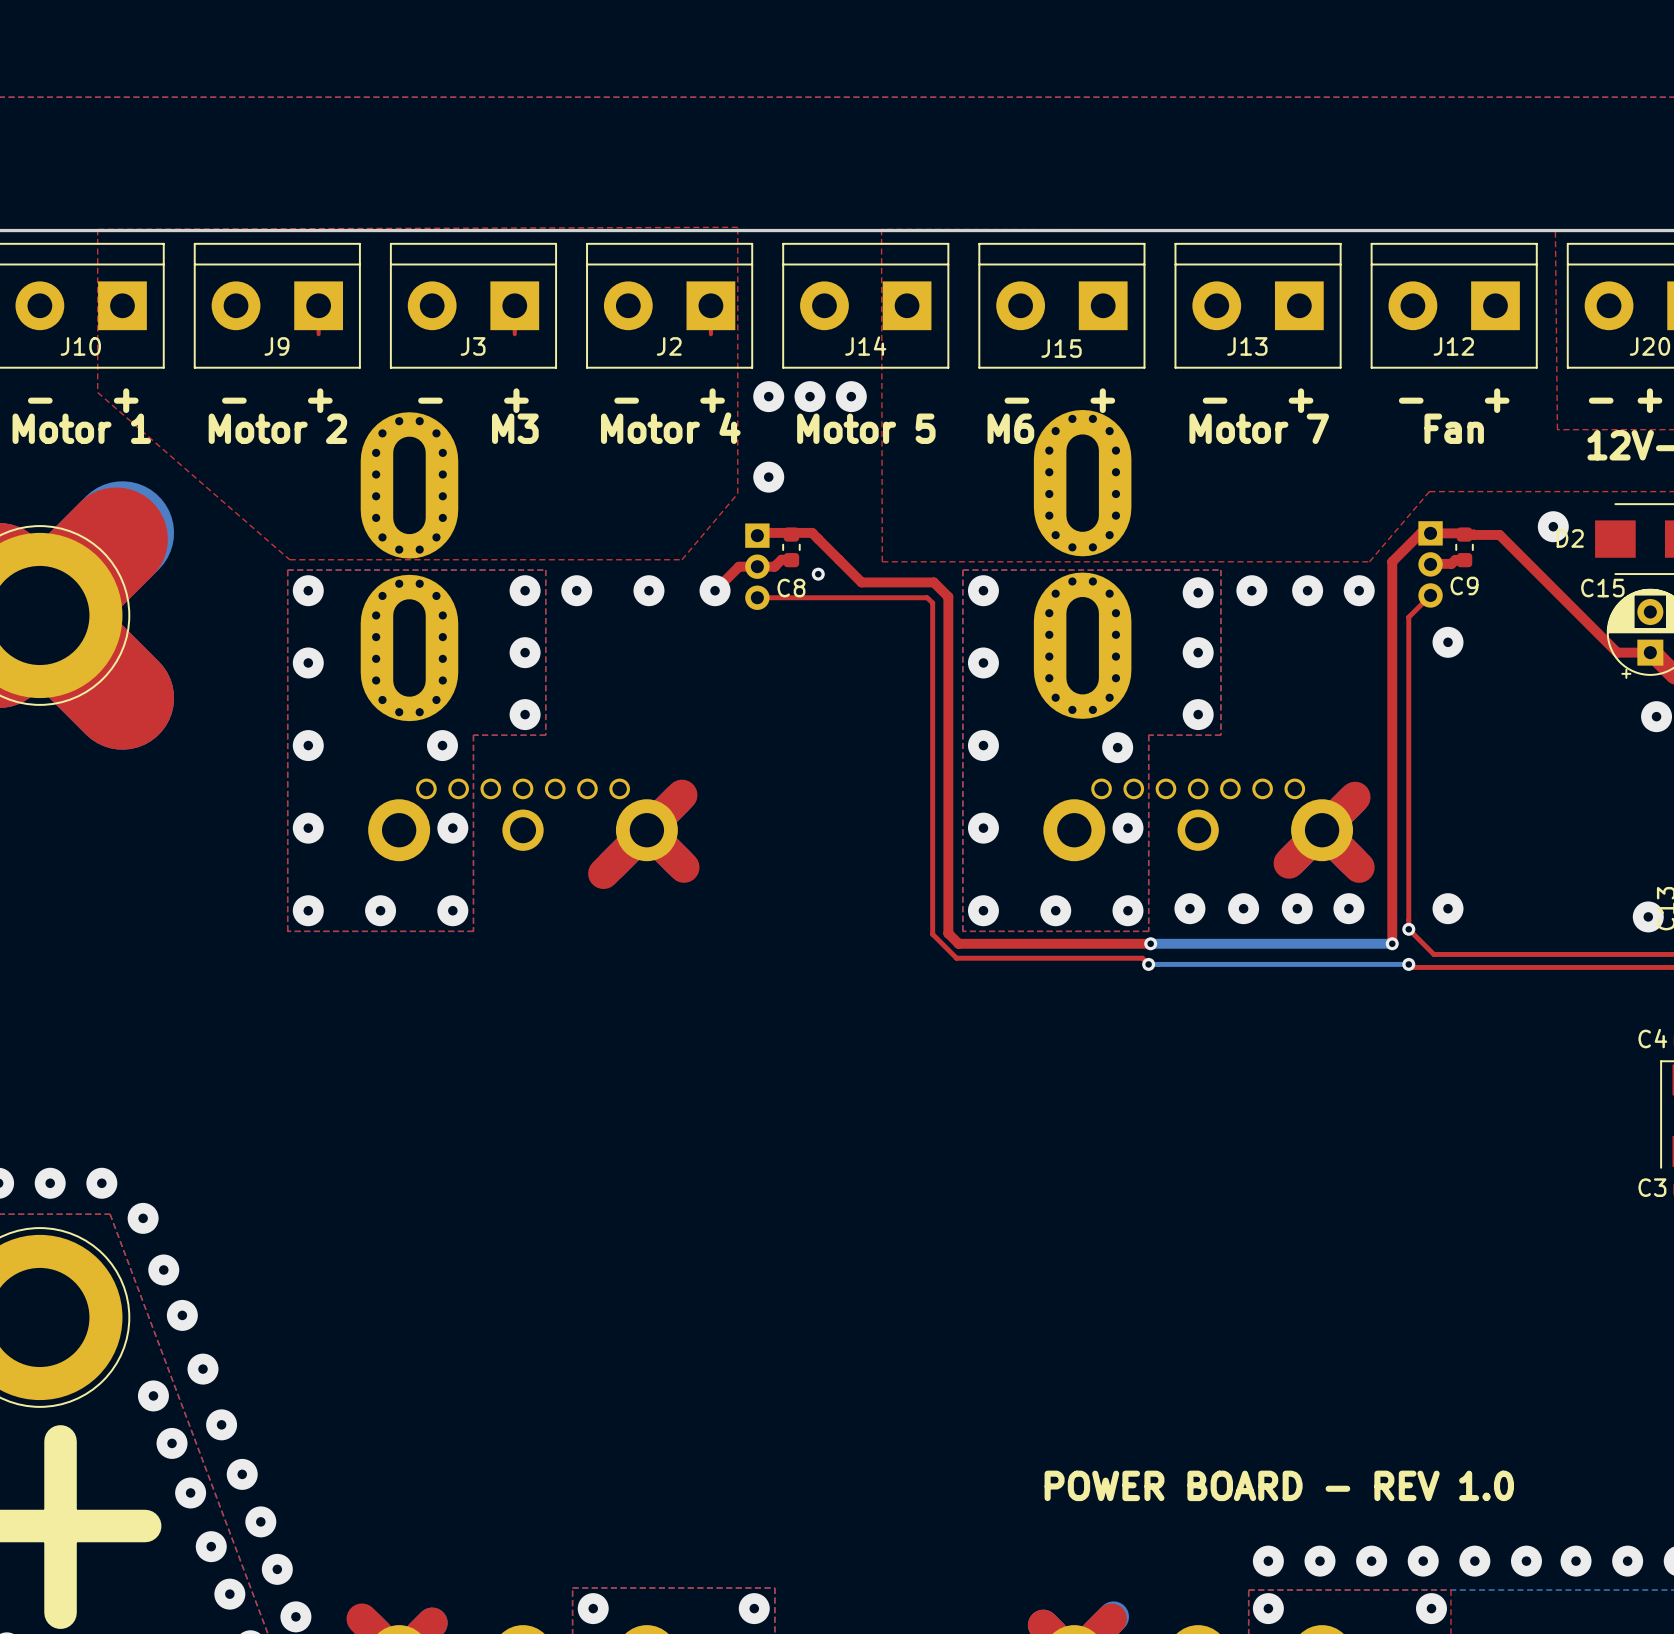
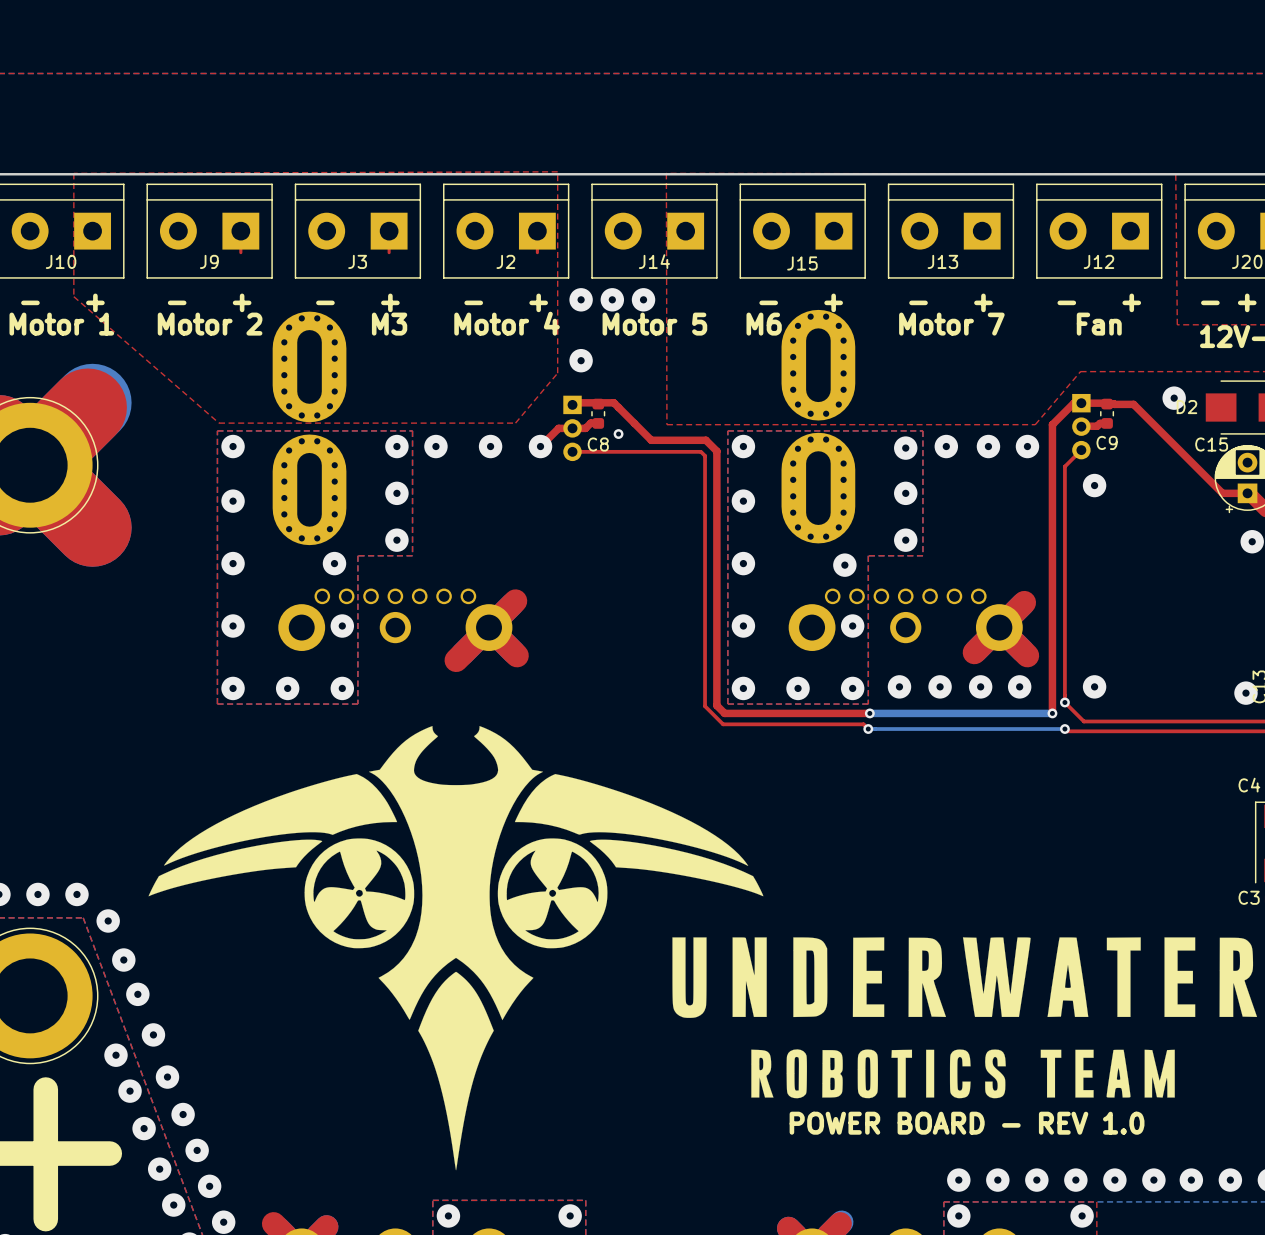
drawing: none -> [148, 726, 1258, 1171]

